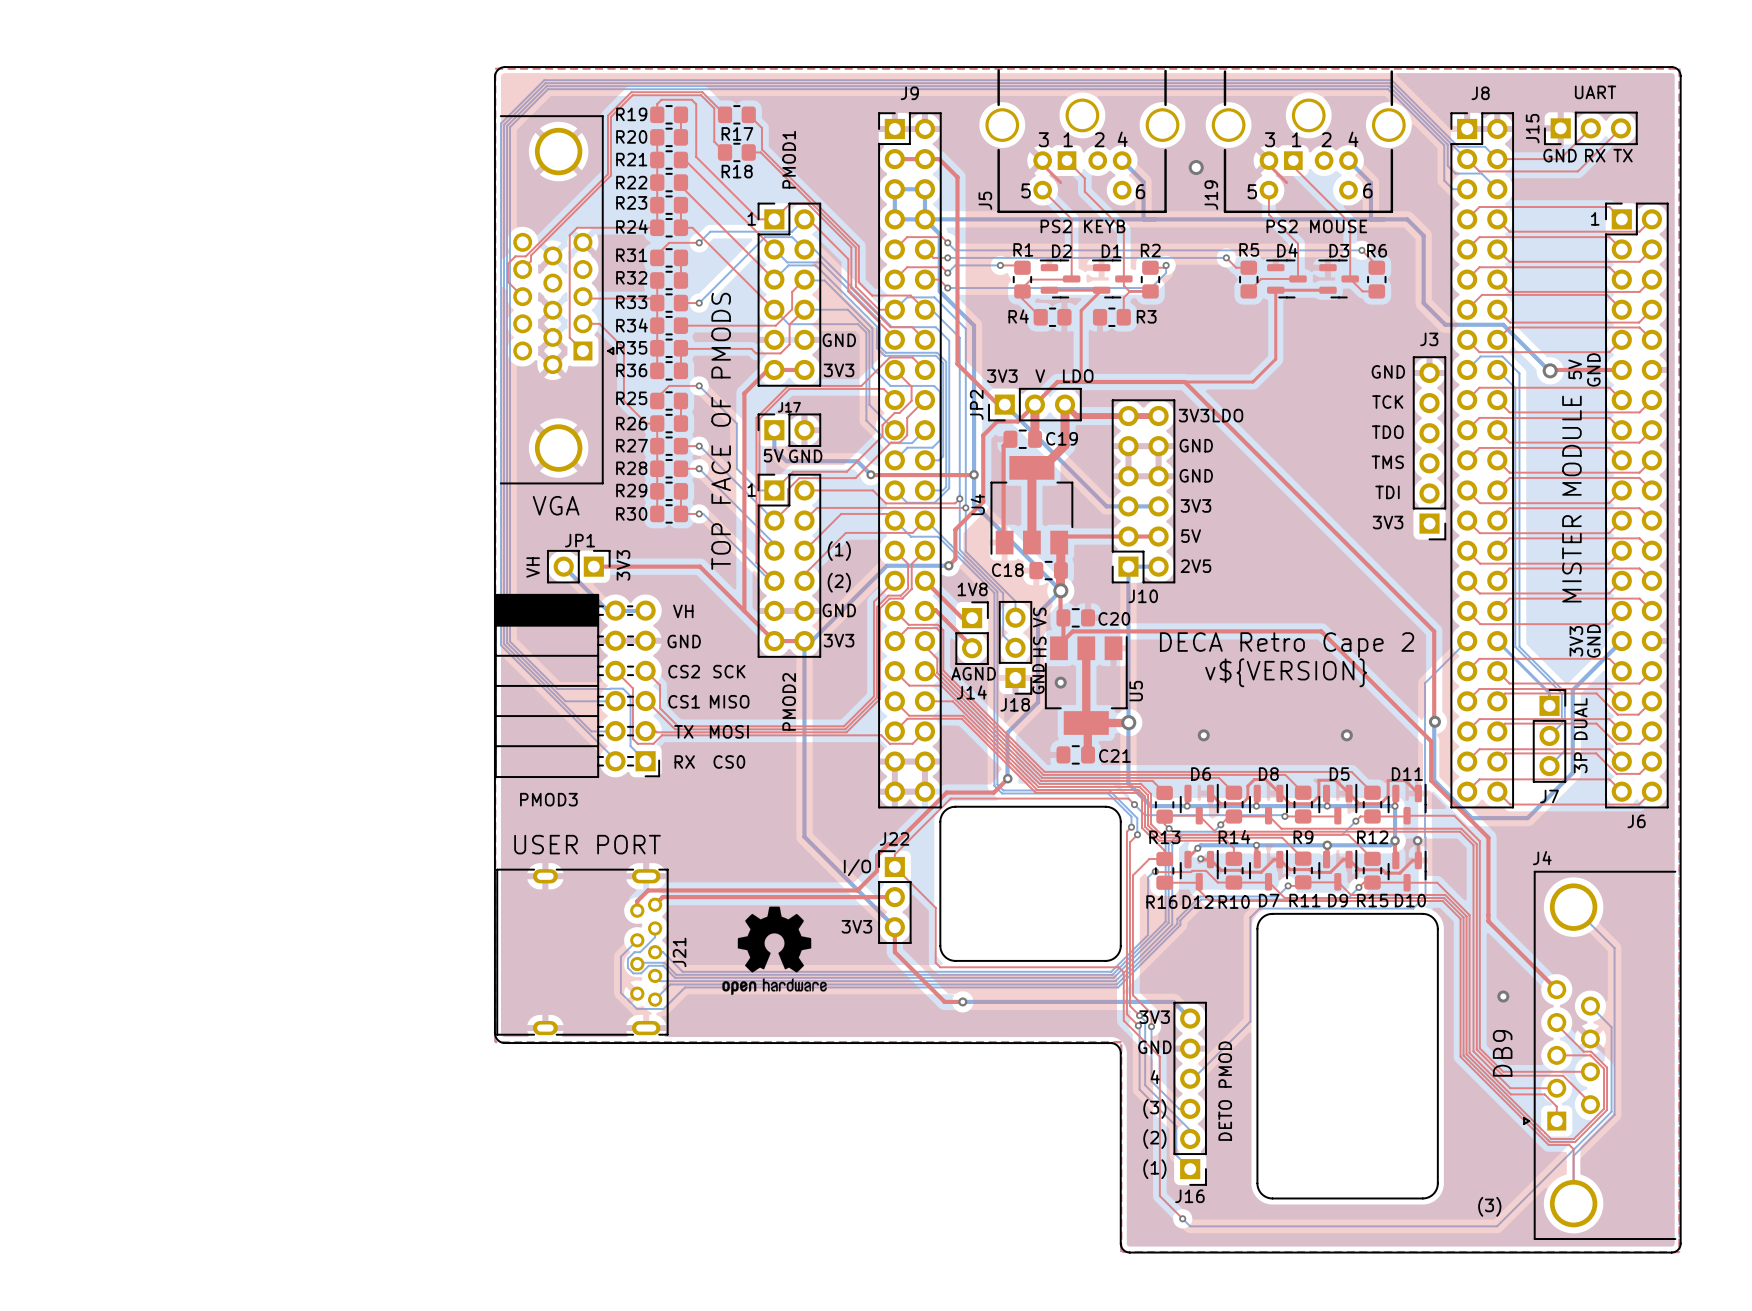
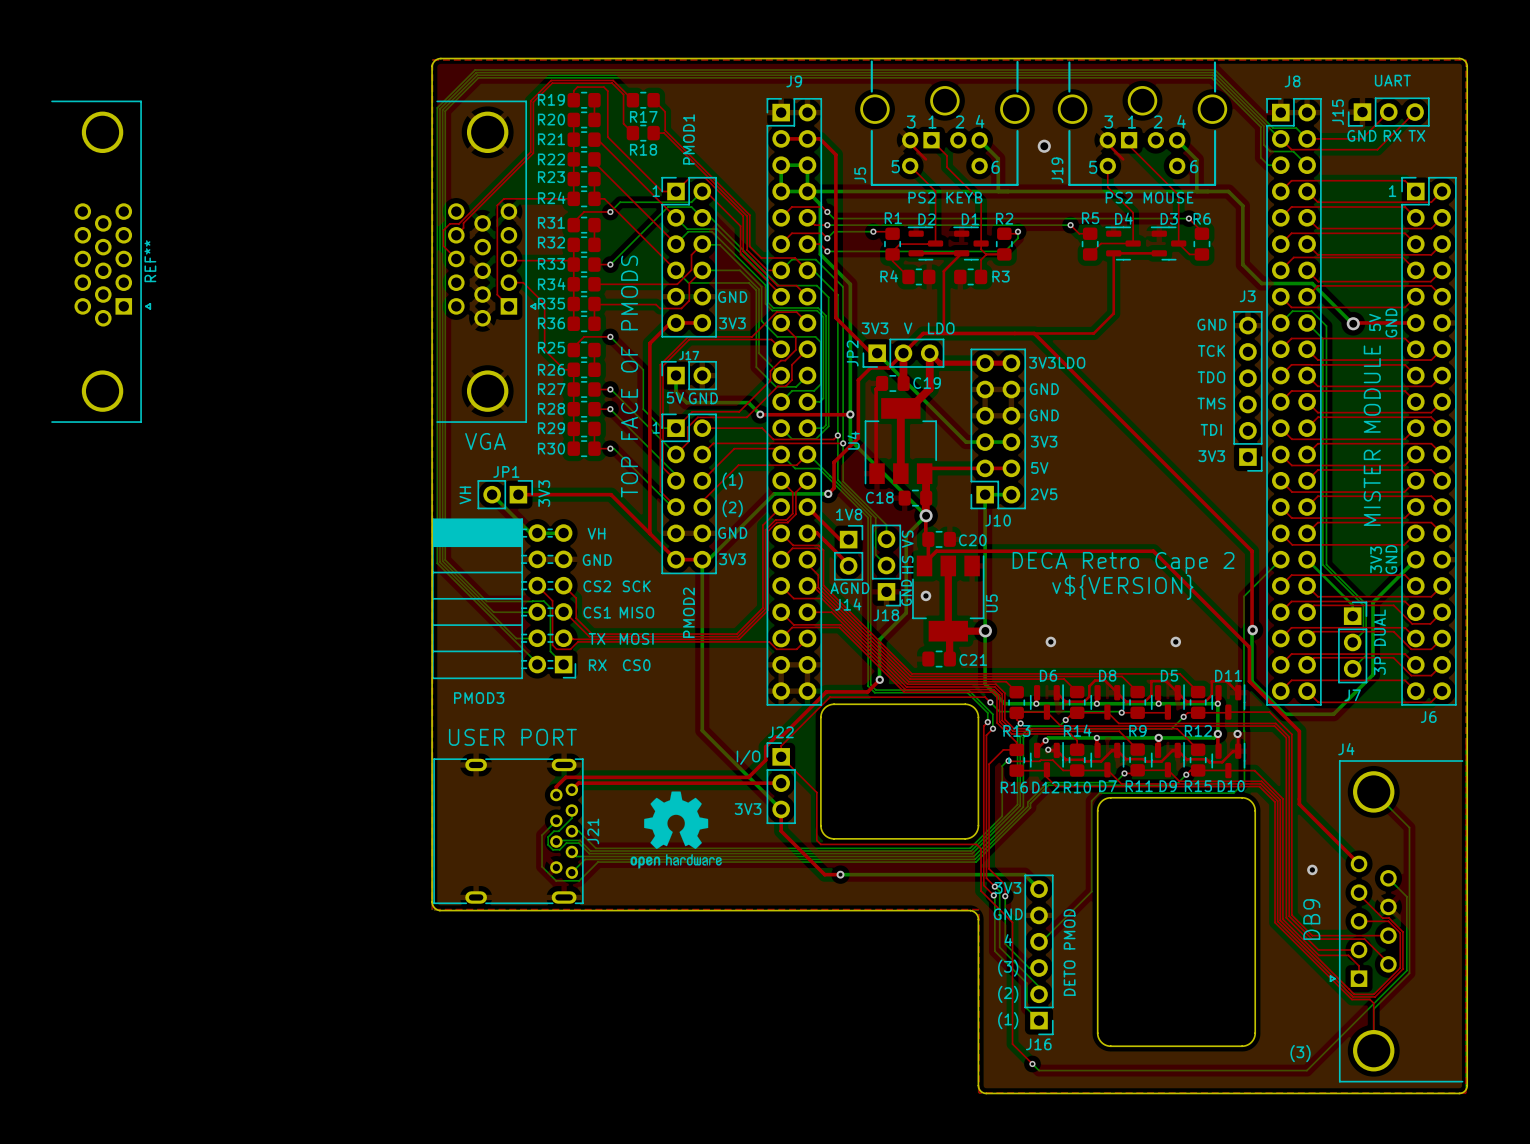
REF**: none -> (101, 261)

